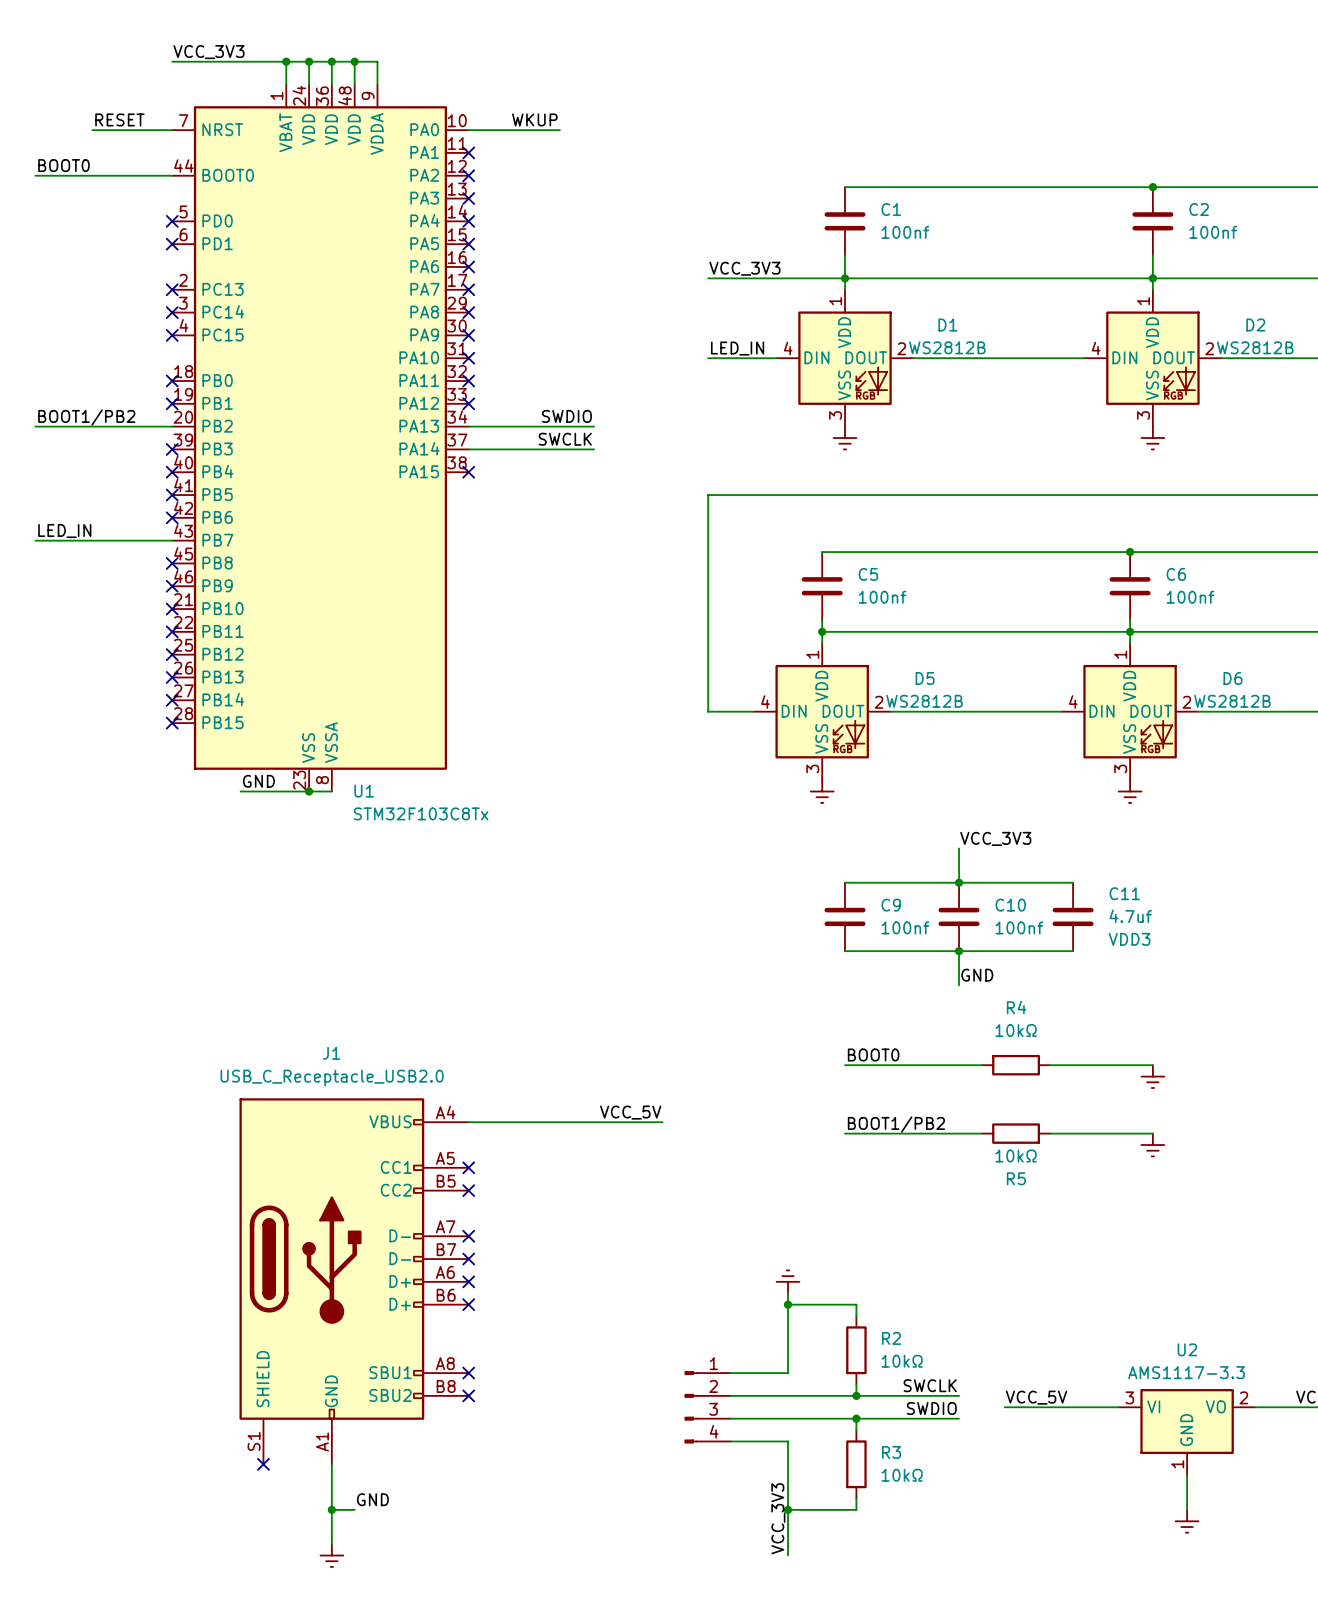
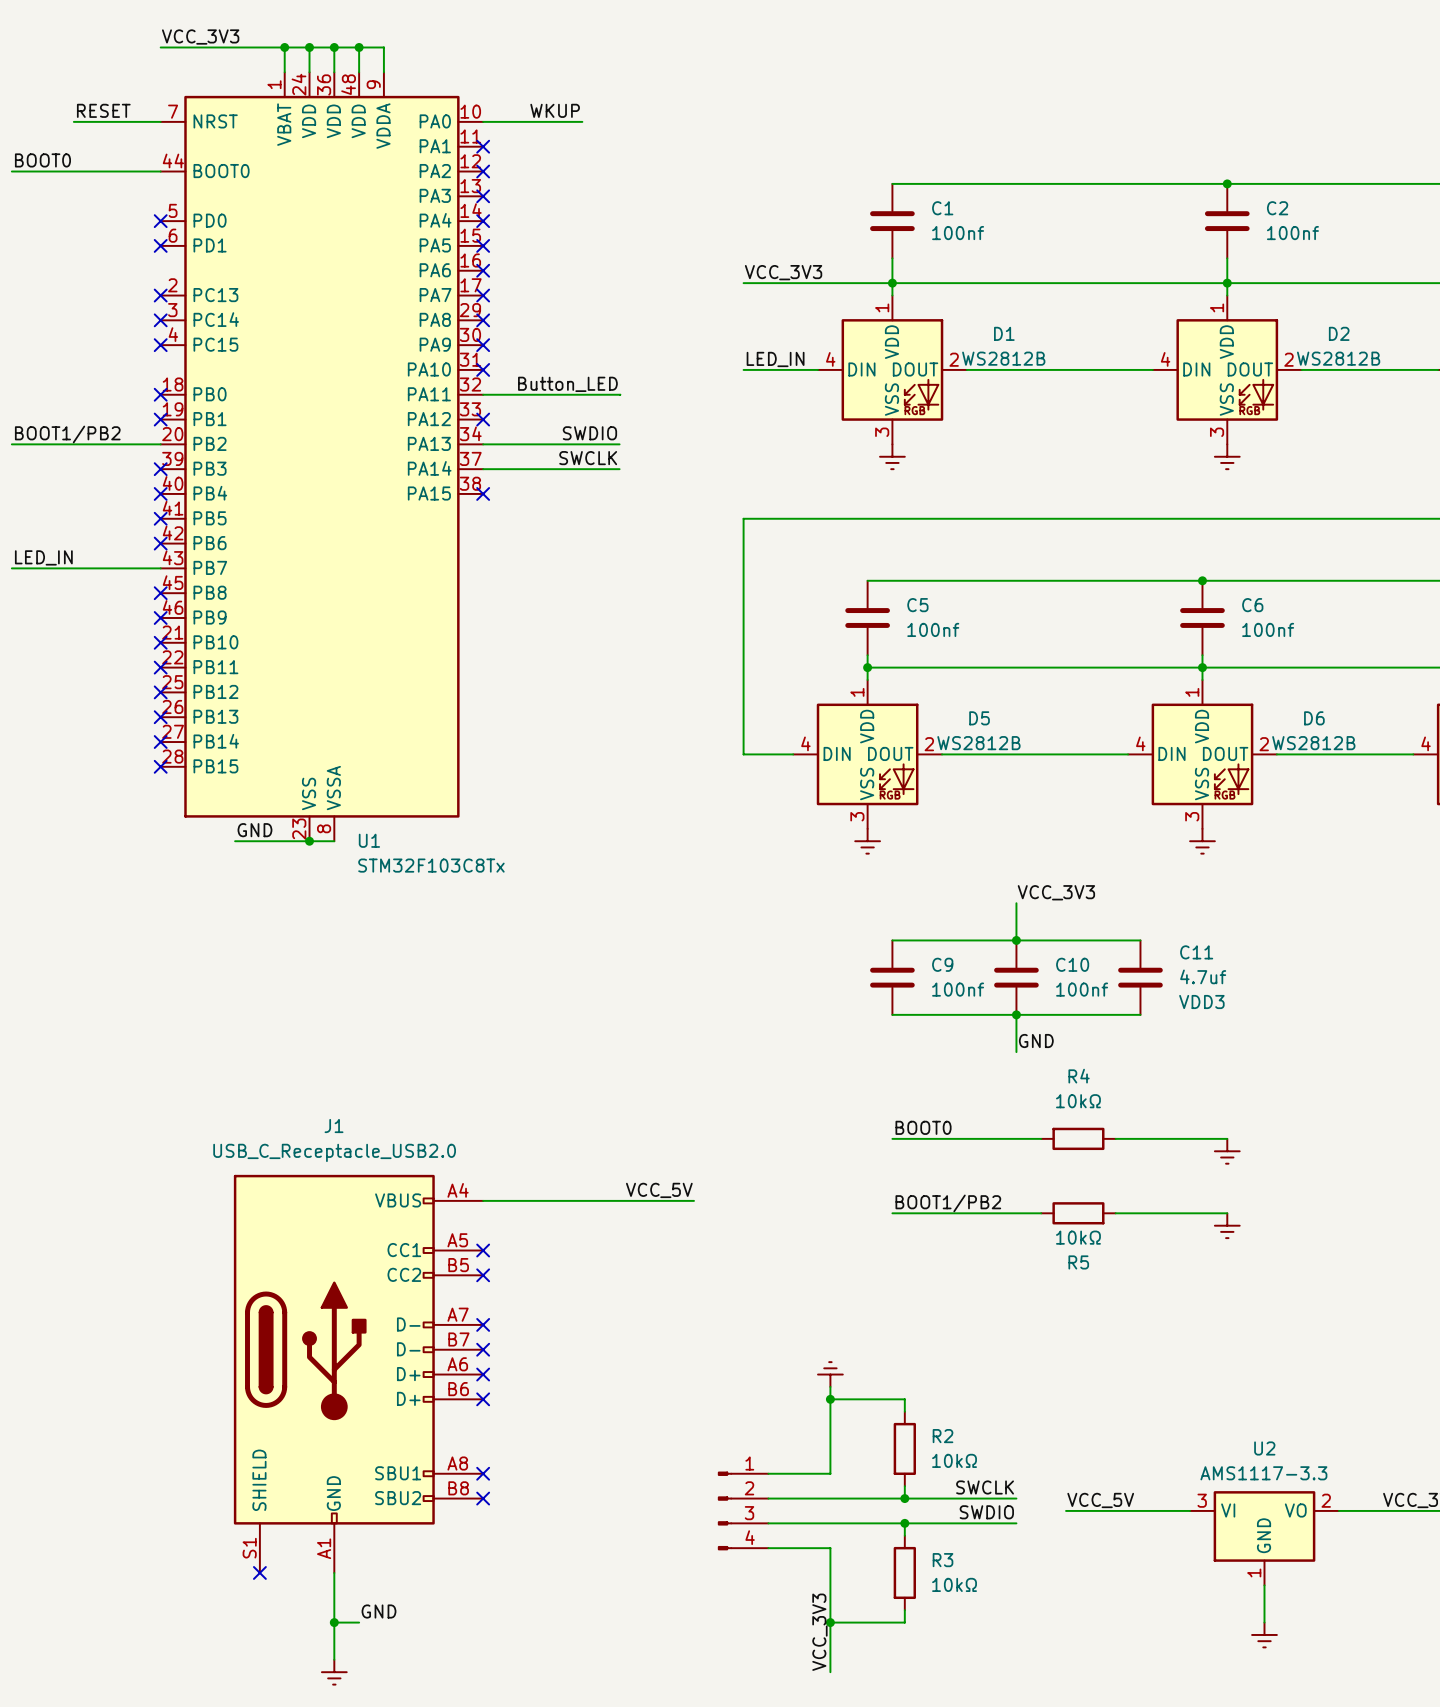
label: none -> Button_LED (567, 384)
wire: none -> (483, 394) (620, 394)
no-connect mark: (468, 381) -> none

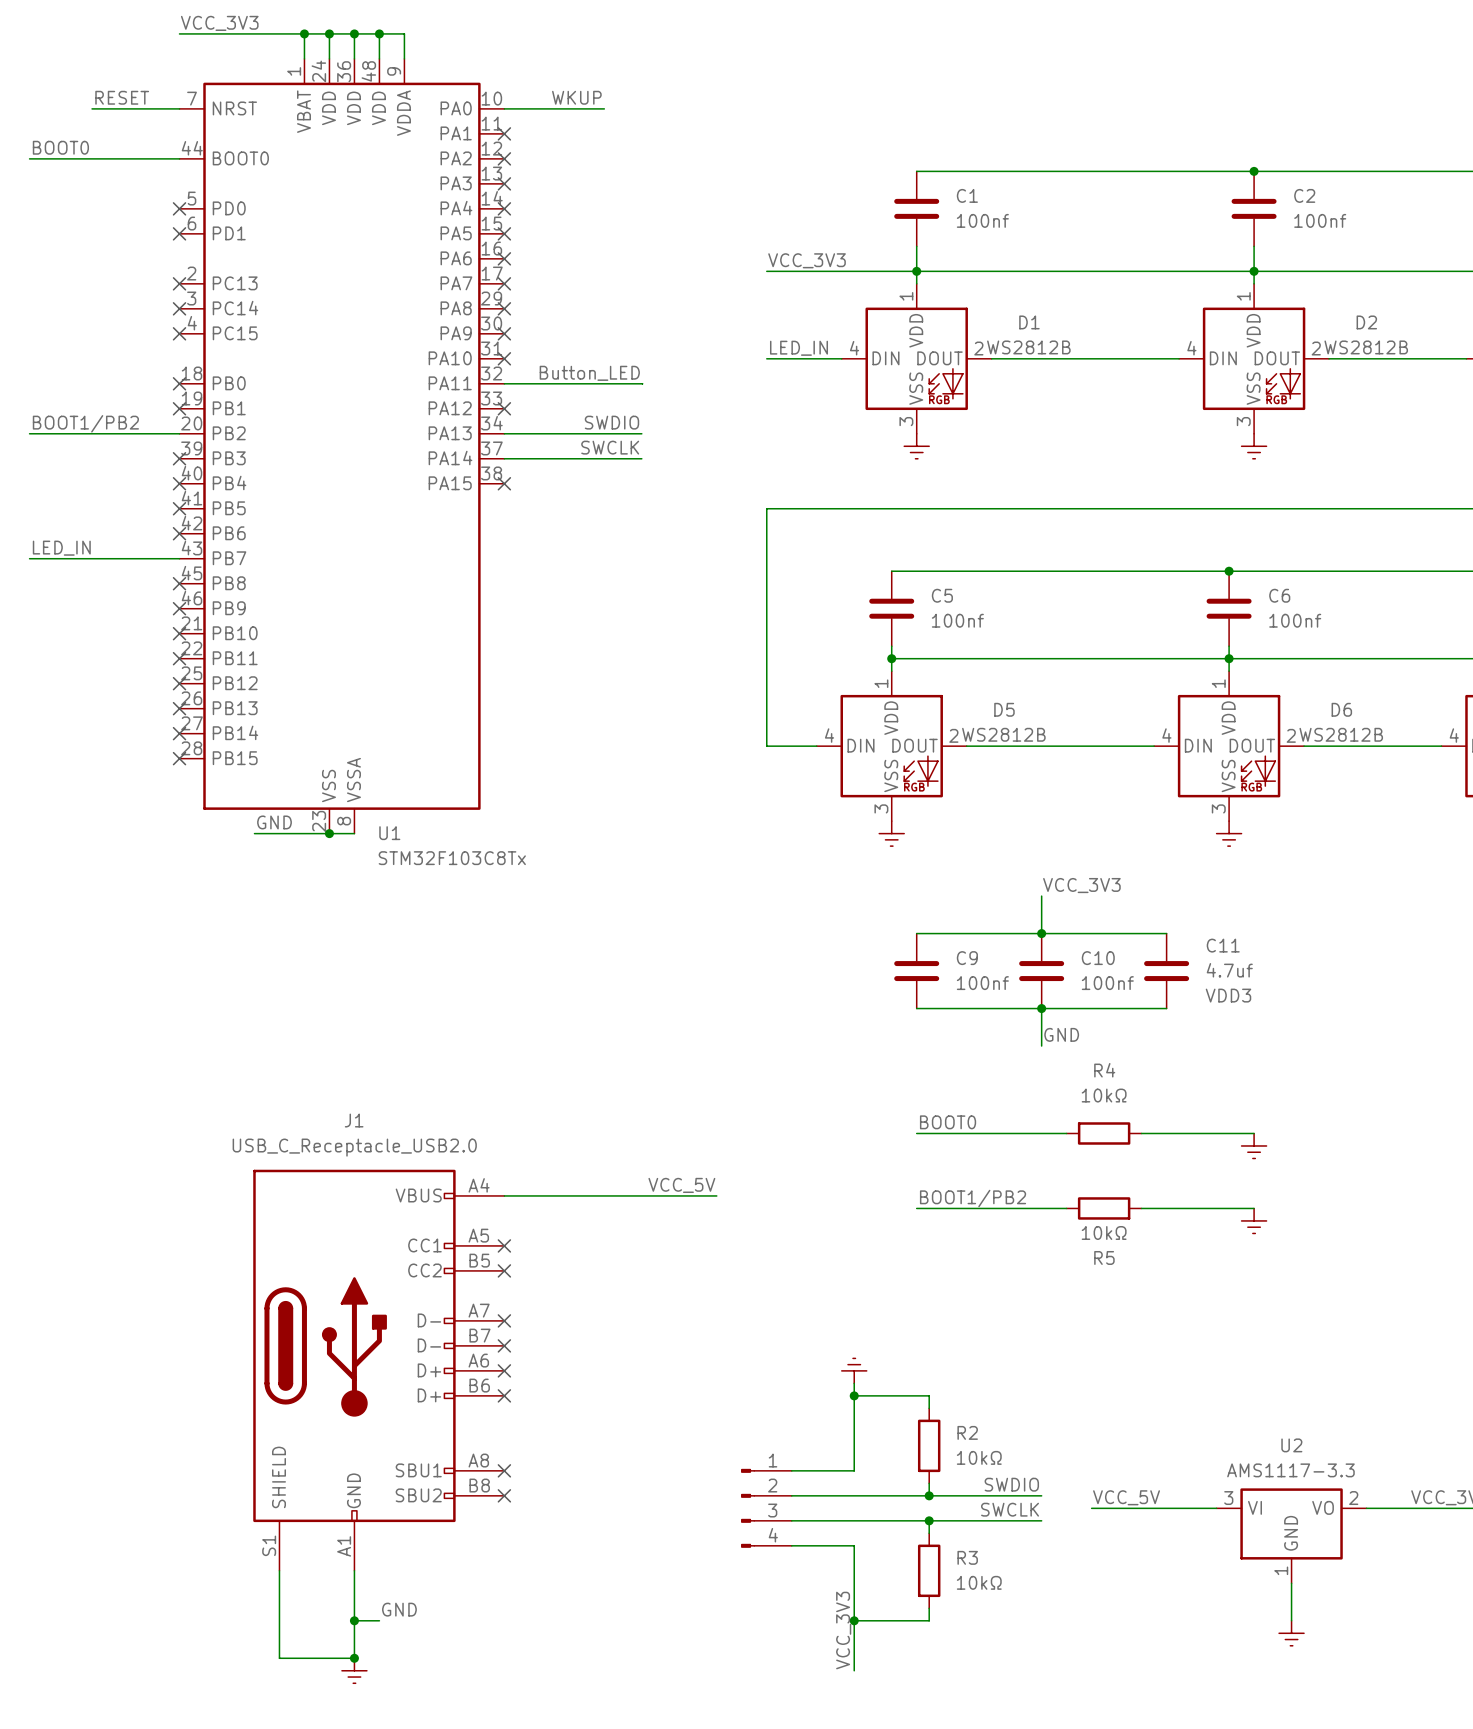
label: SWCLK (985, 1487) -> SWDIO (1011, 1484)
label: SWDIO (986, 1512) -> SWCLK (1010, 1509)
wire: none -> (279, 1570) (279, 1658) (354, 1658)
no-connect mark: (259, 1572) -> none
junction: none -> (354, 1658)

